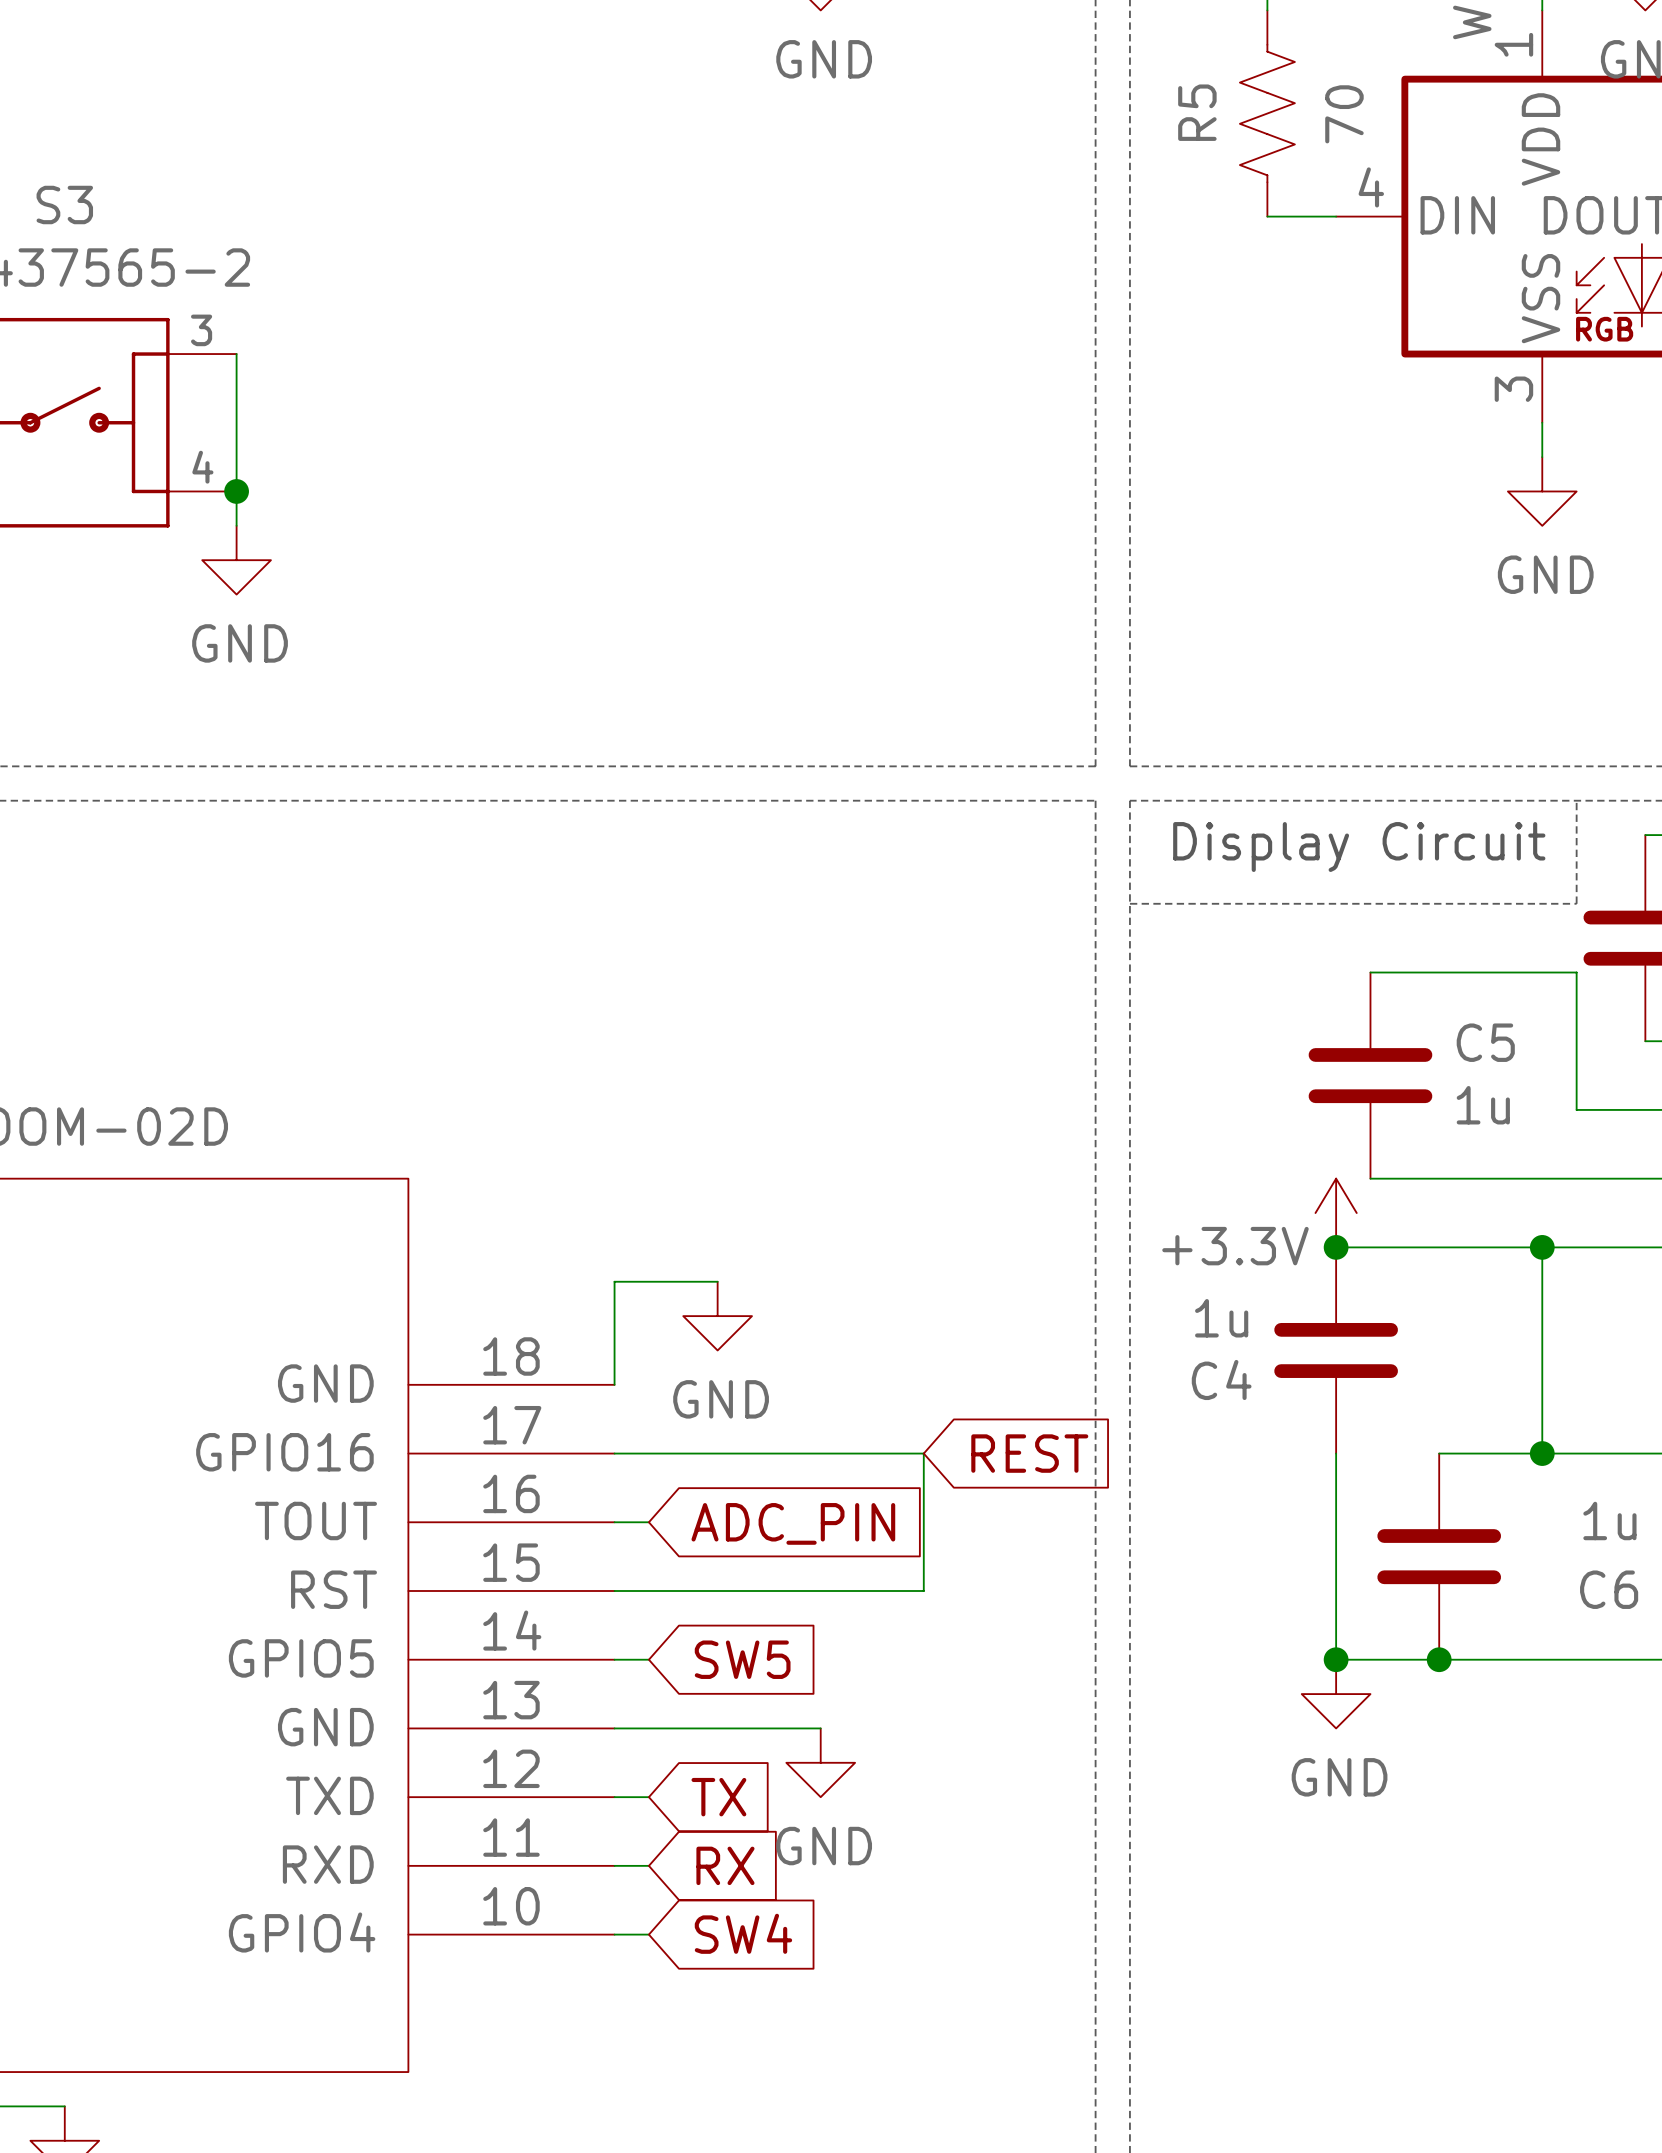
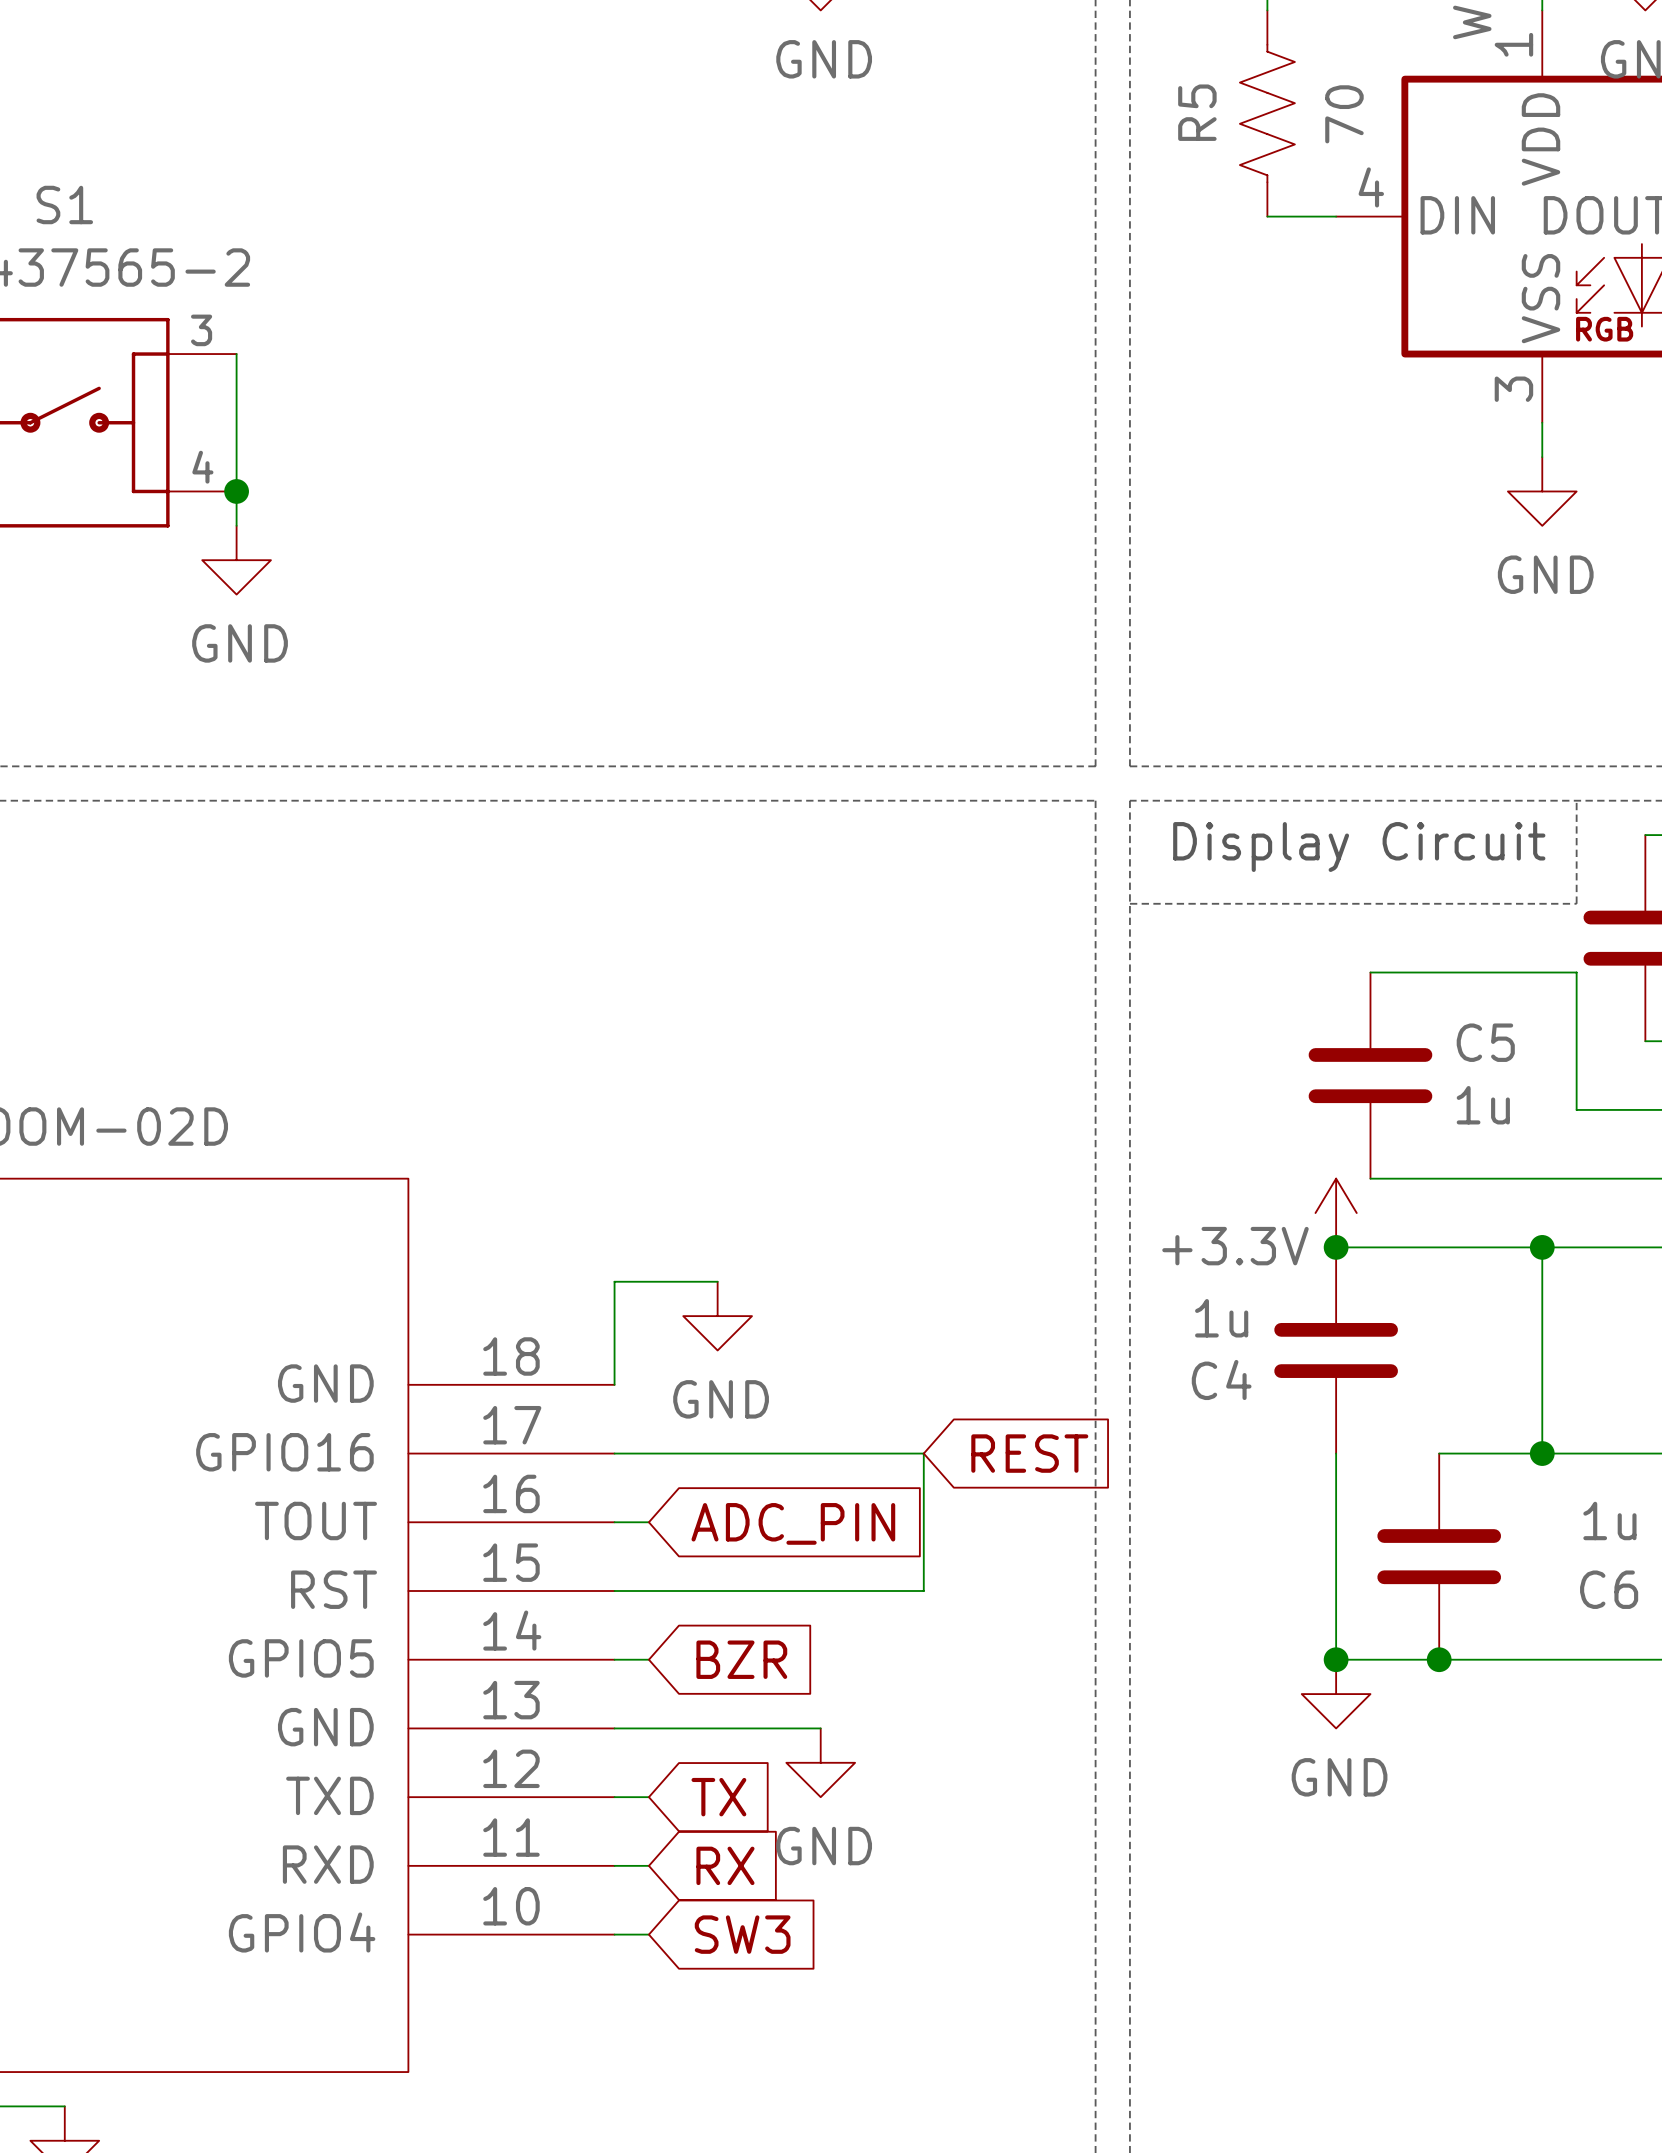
S3 name: S3 (64, 204) -> S1 (64, 204)
global label: SW5 (742, 1659) -> BZR (741, 1659)
global label: SW4 (743, 1933) -> SW3 (742, 1934)

